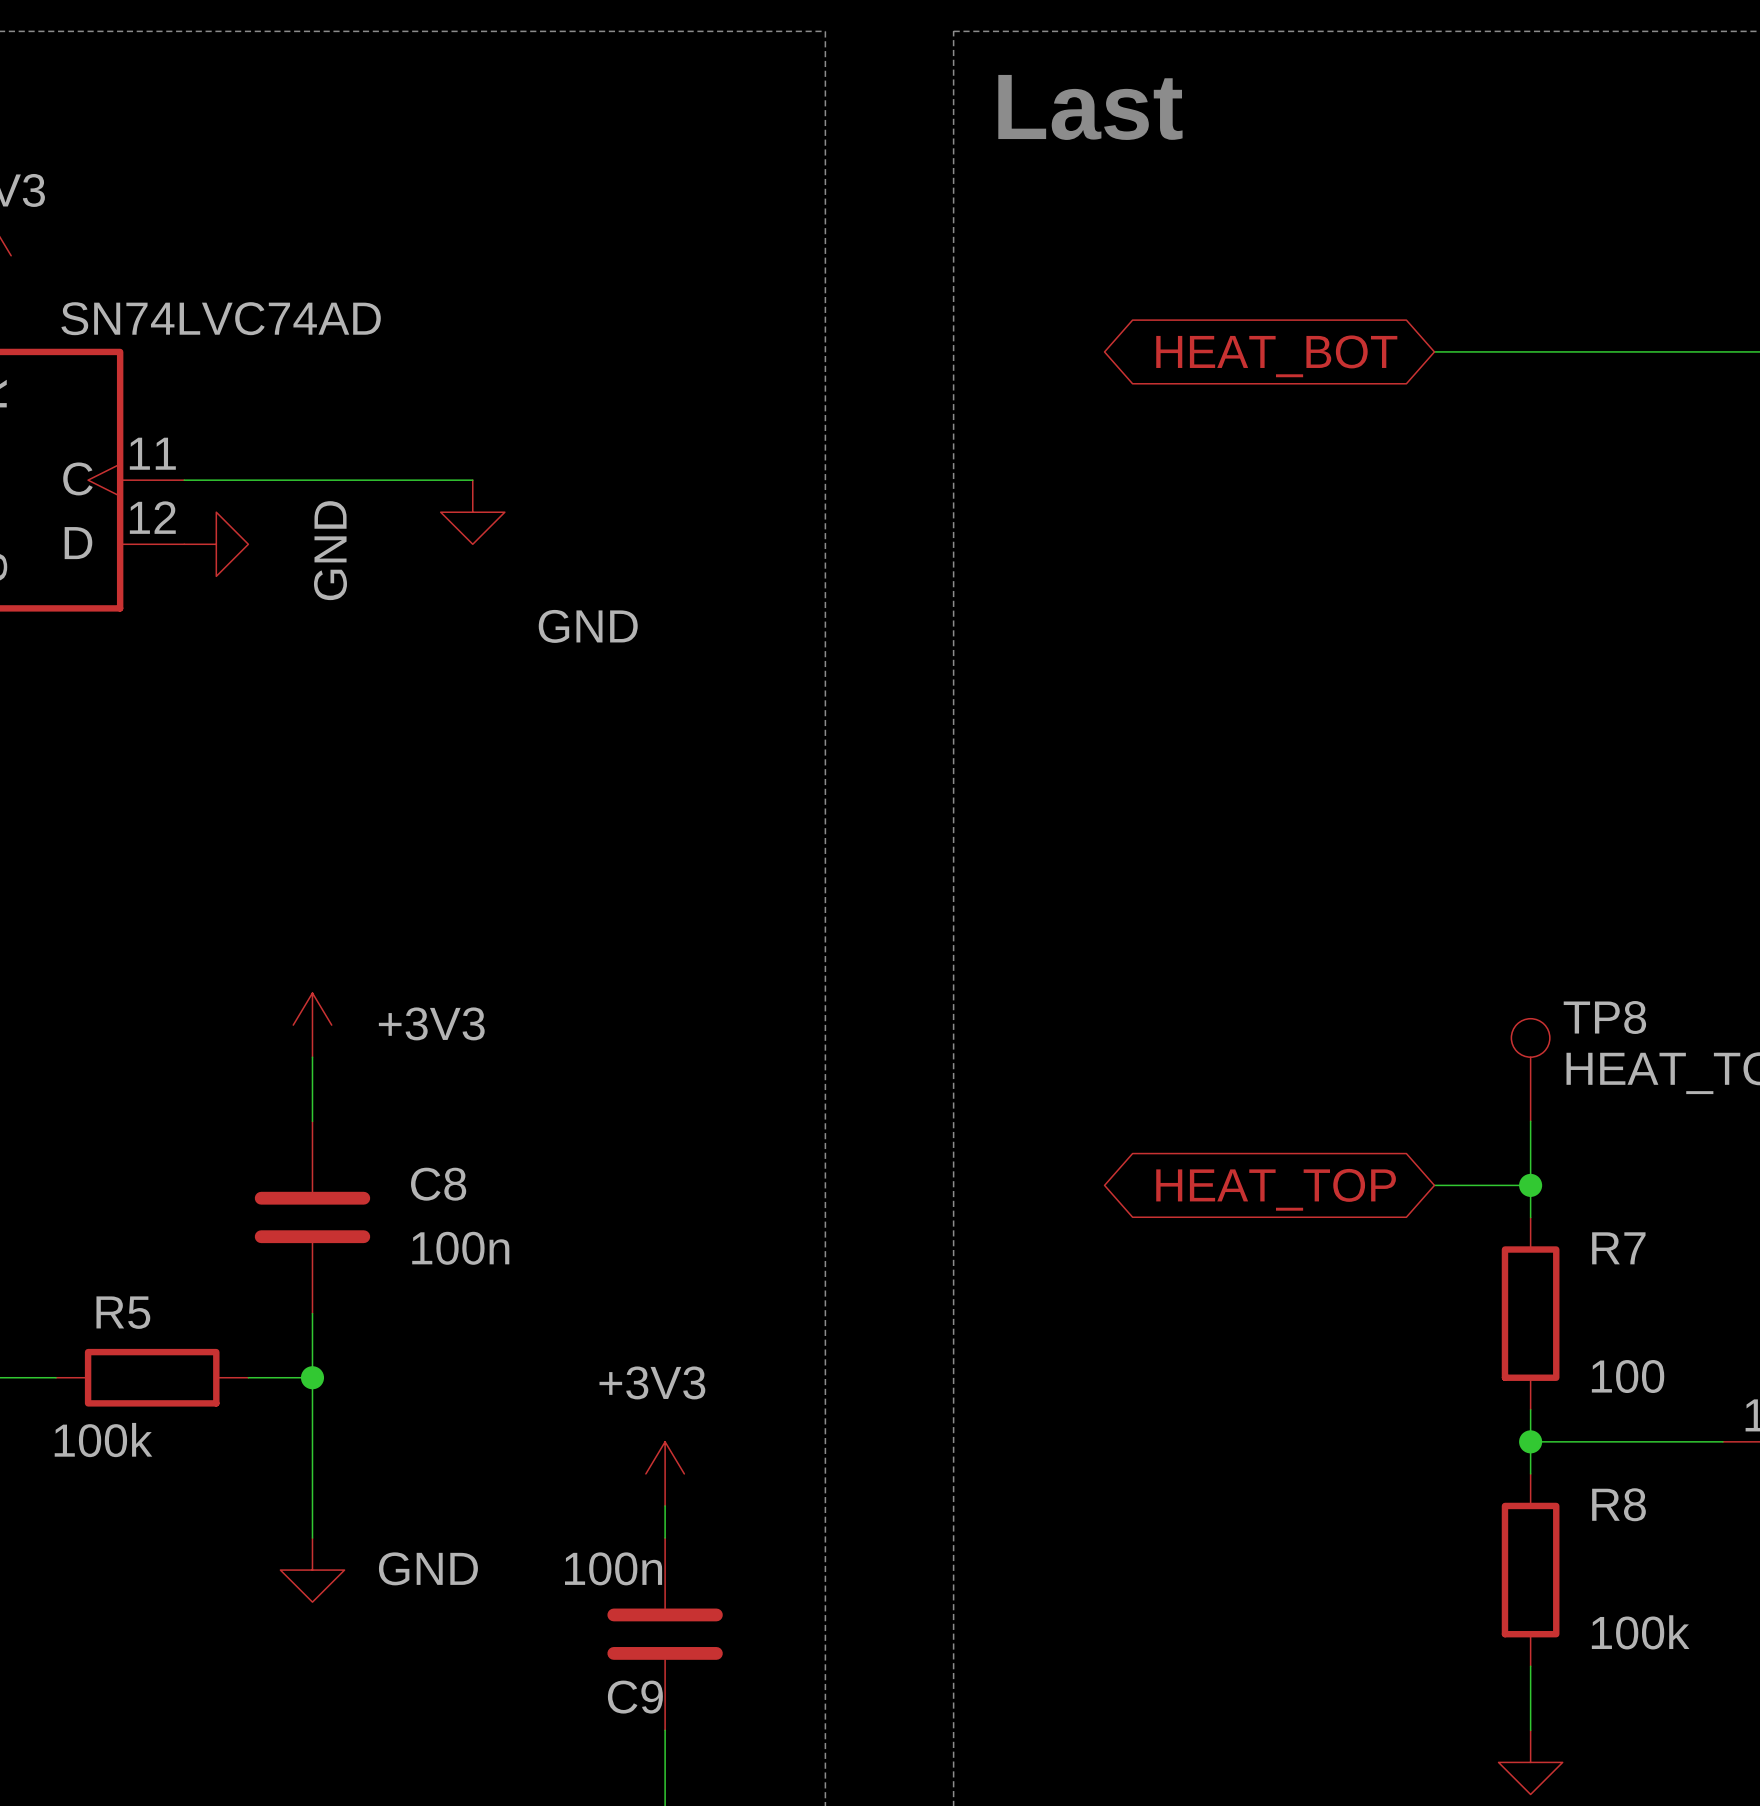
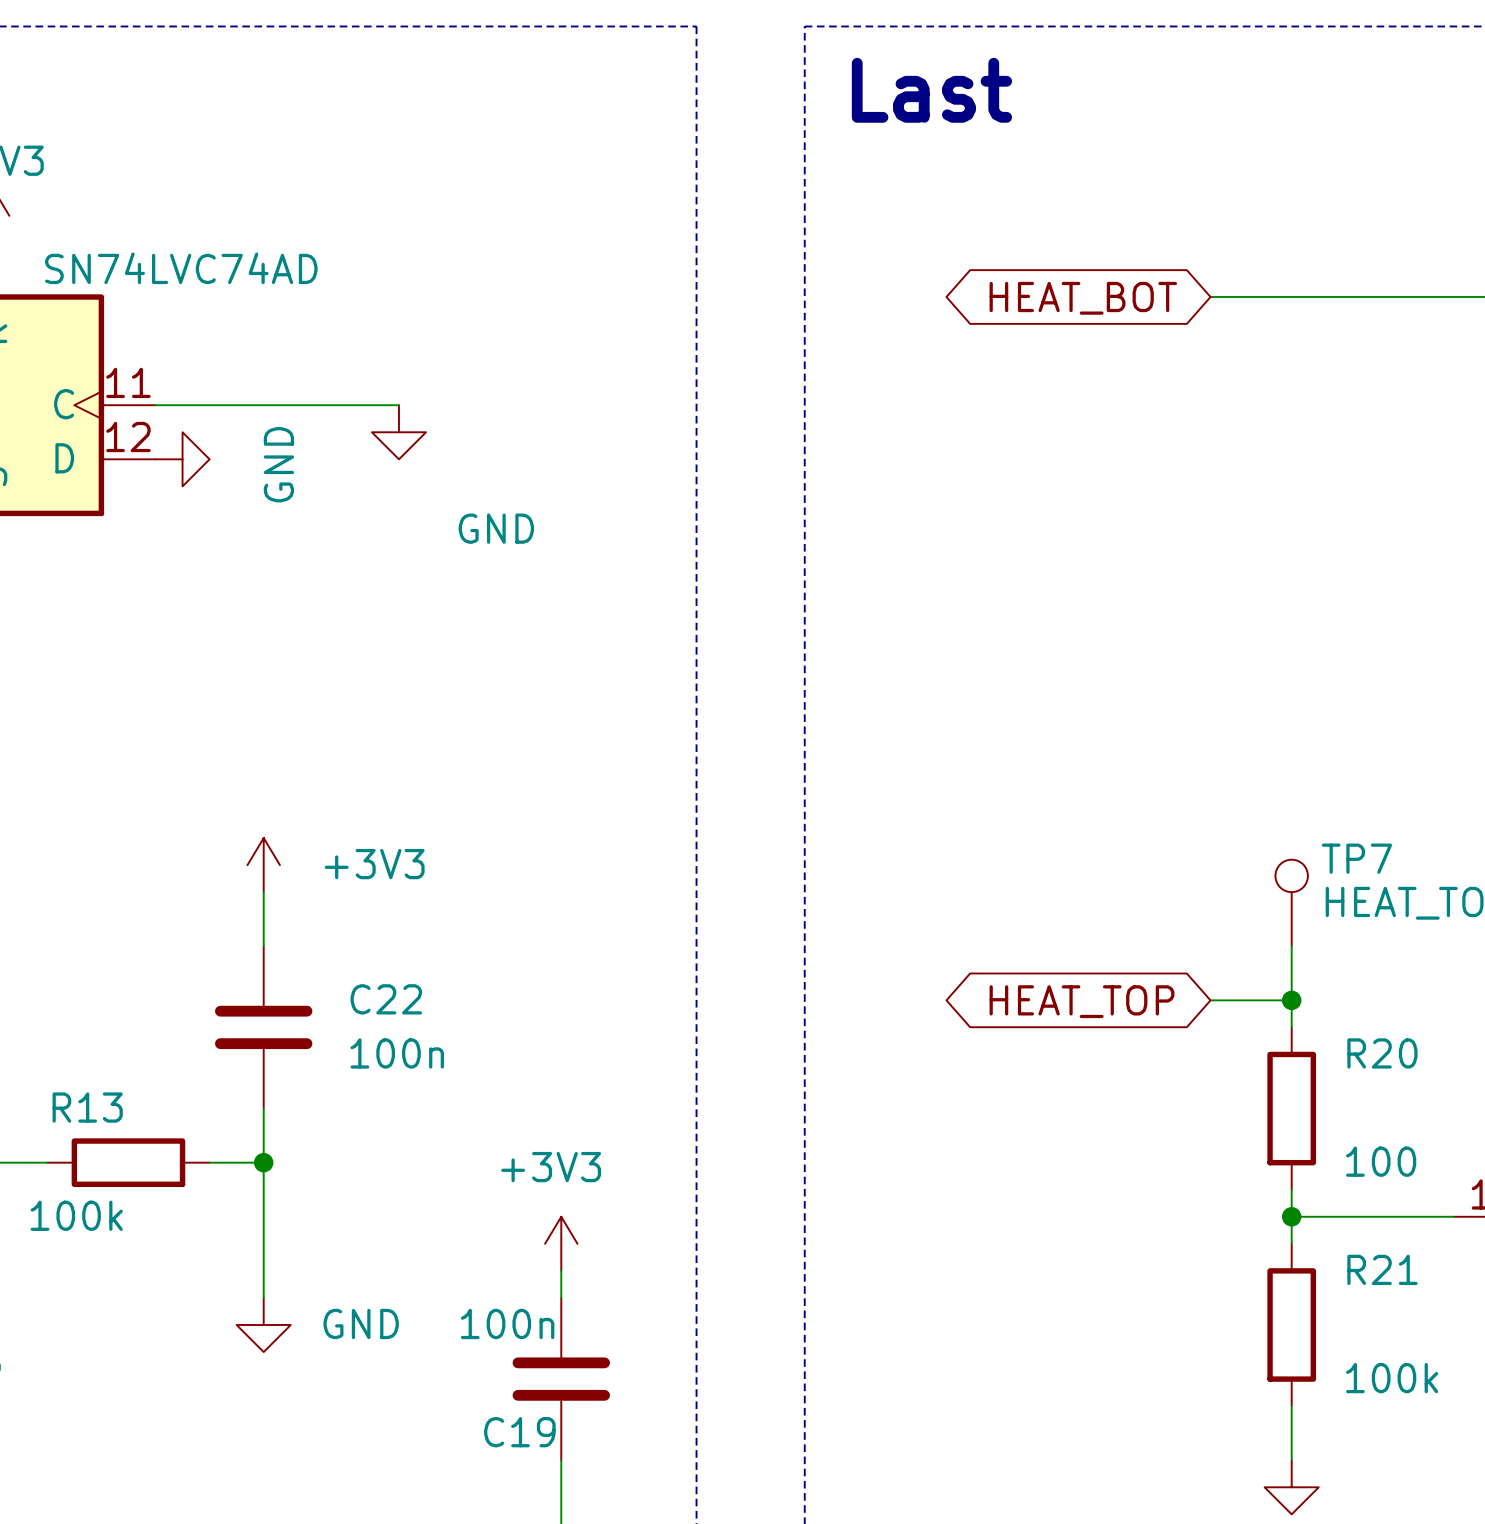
TP8 name: TP8 (1604, 1017) -> TP7 (1356, 858)
C8 name: C8 (438, 1184) -> C22 (386, 999)
R7 name: R7 (1618, 1248) -> R20 (1382, 1053)
R5 name: R5 (123, 1312) -> R13 (87, 1107)
R8 name: R8 (1618, 1504) -> R21 (1382, 1269)
C9 name: C9 (635, 1697) -> C19 (519, 1432)

